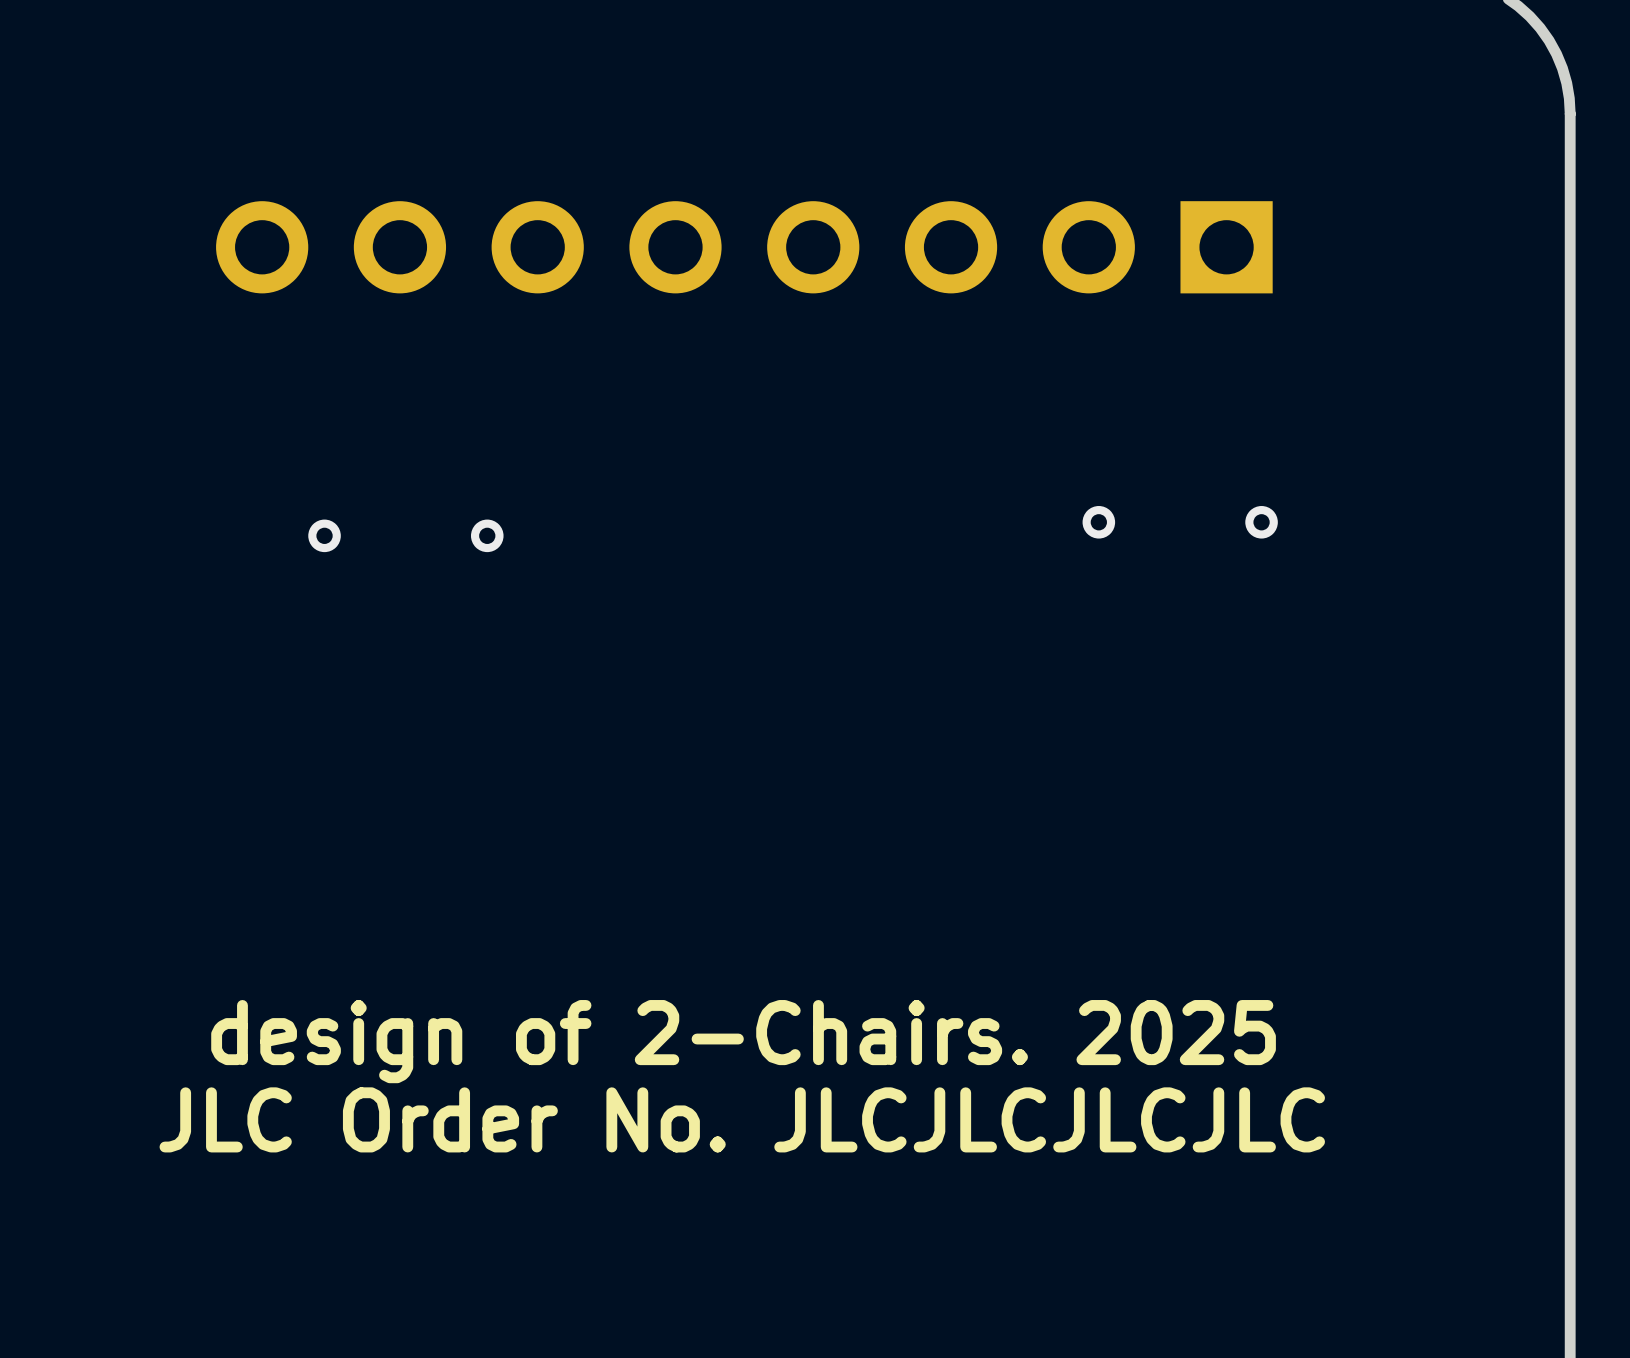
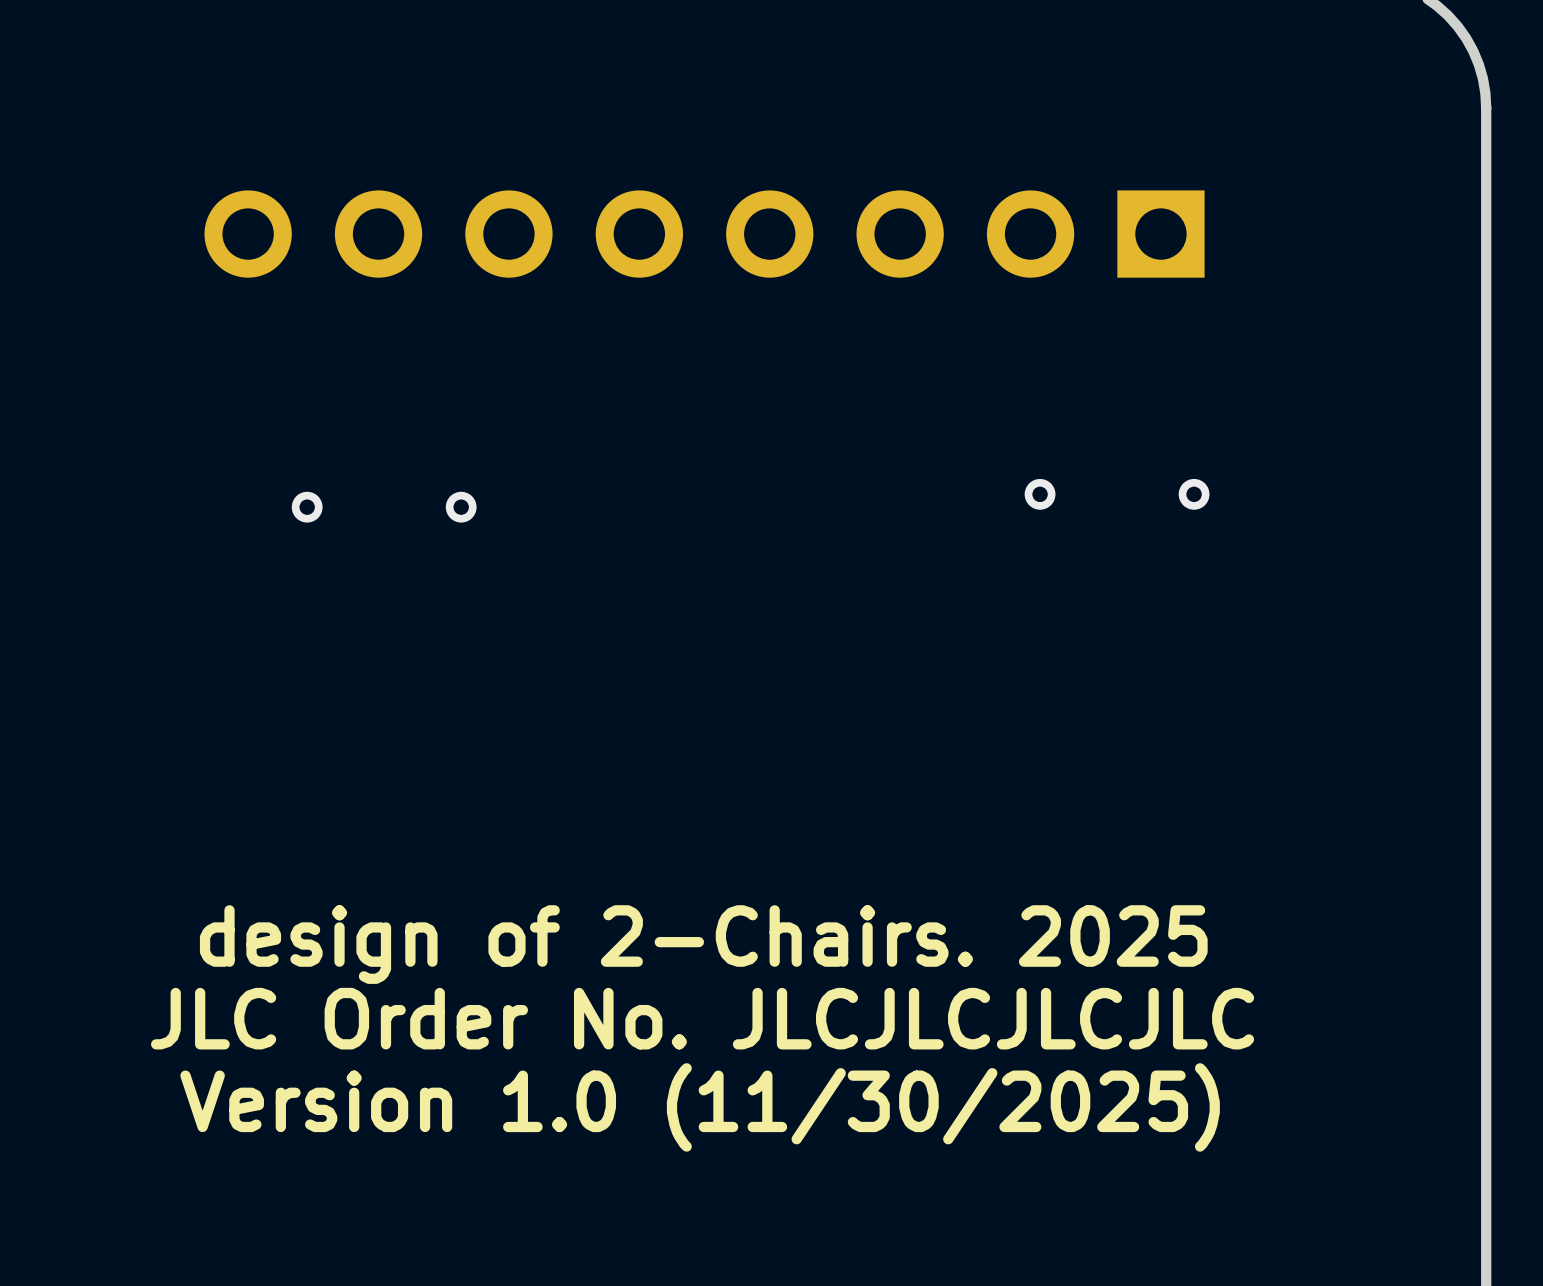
text position: design of 2-Chairs. 2025 (743, 1041) -> design of 2-Chairs. 2025 (703, 944)
text position: JLC Order No. JLCJLCJLCJLC (742, 1119) -> JLC Order No. JLCJLCJLCJLC (702, 1018)
text: none -> Version 1.0 (11/30/2025) (700, 1107)

